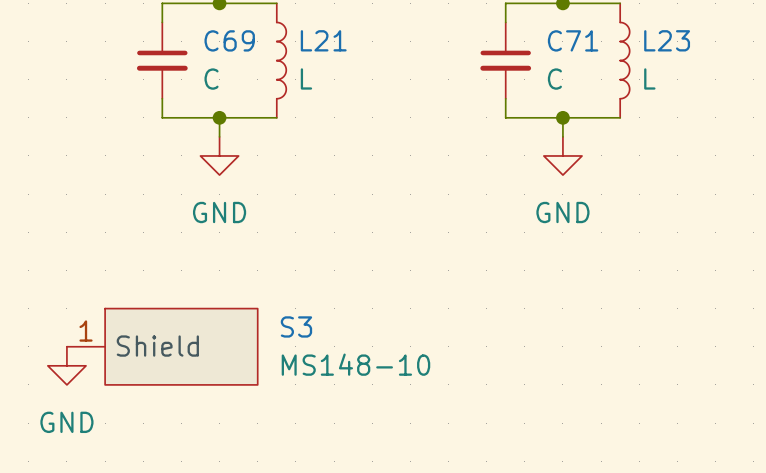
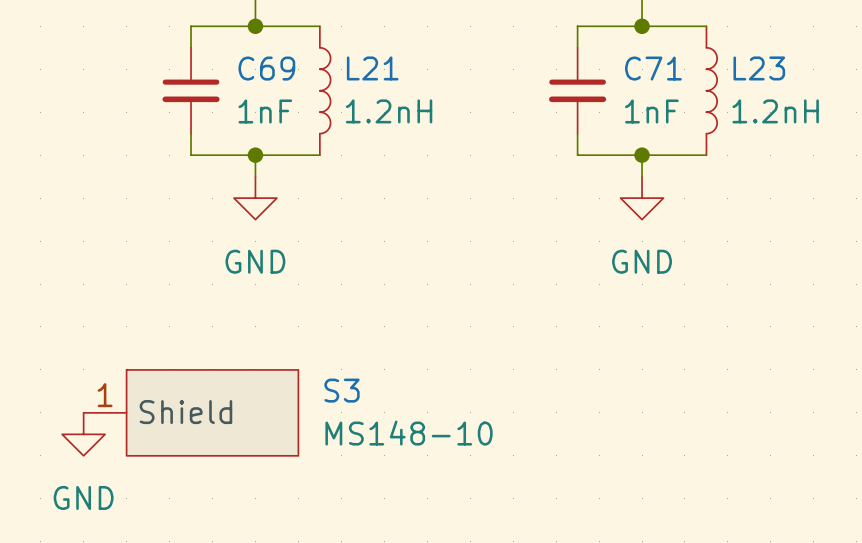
L21 value: L (306, 78) -> 1.2nH (389, 111)
L23 value: L (649, 78) -> 1.2nH (775, 111)
C69 value: C (211, 79) -> 1nF (265, 111)
C71 value: C (554, 79) -> 1nF (651, 111)

